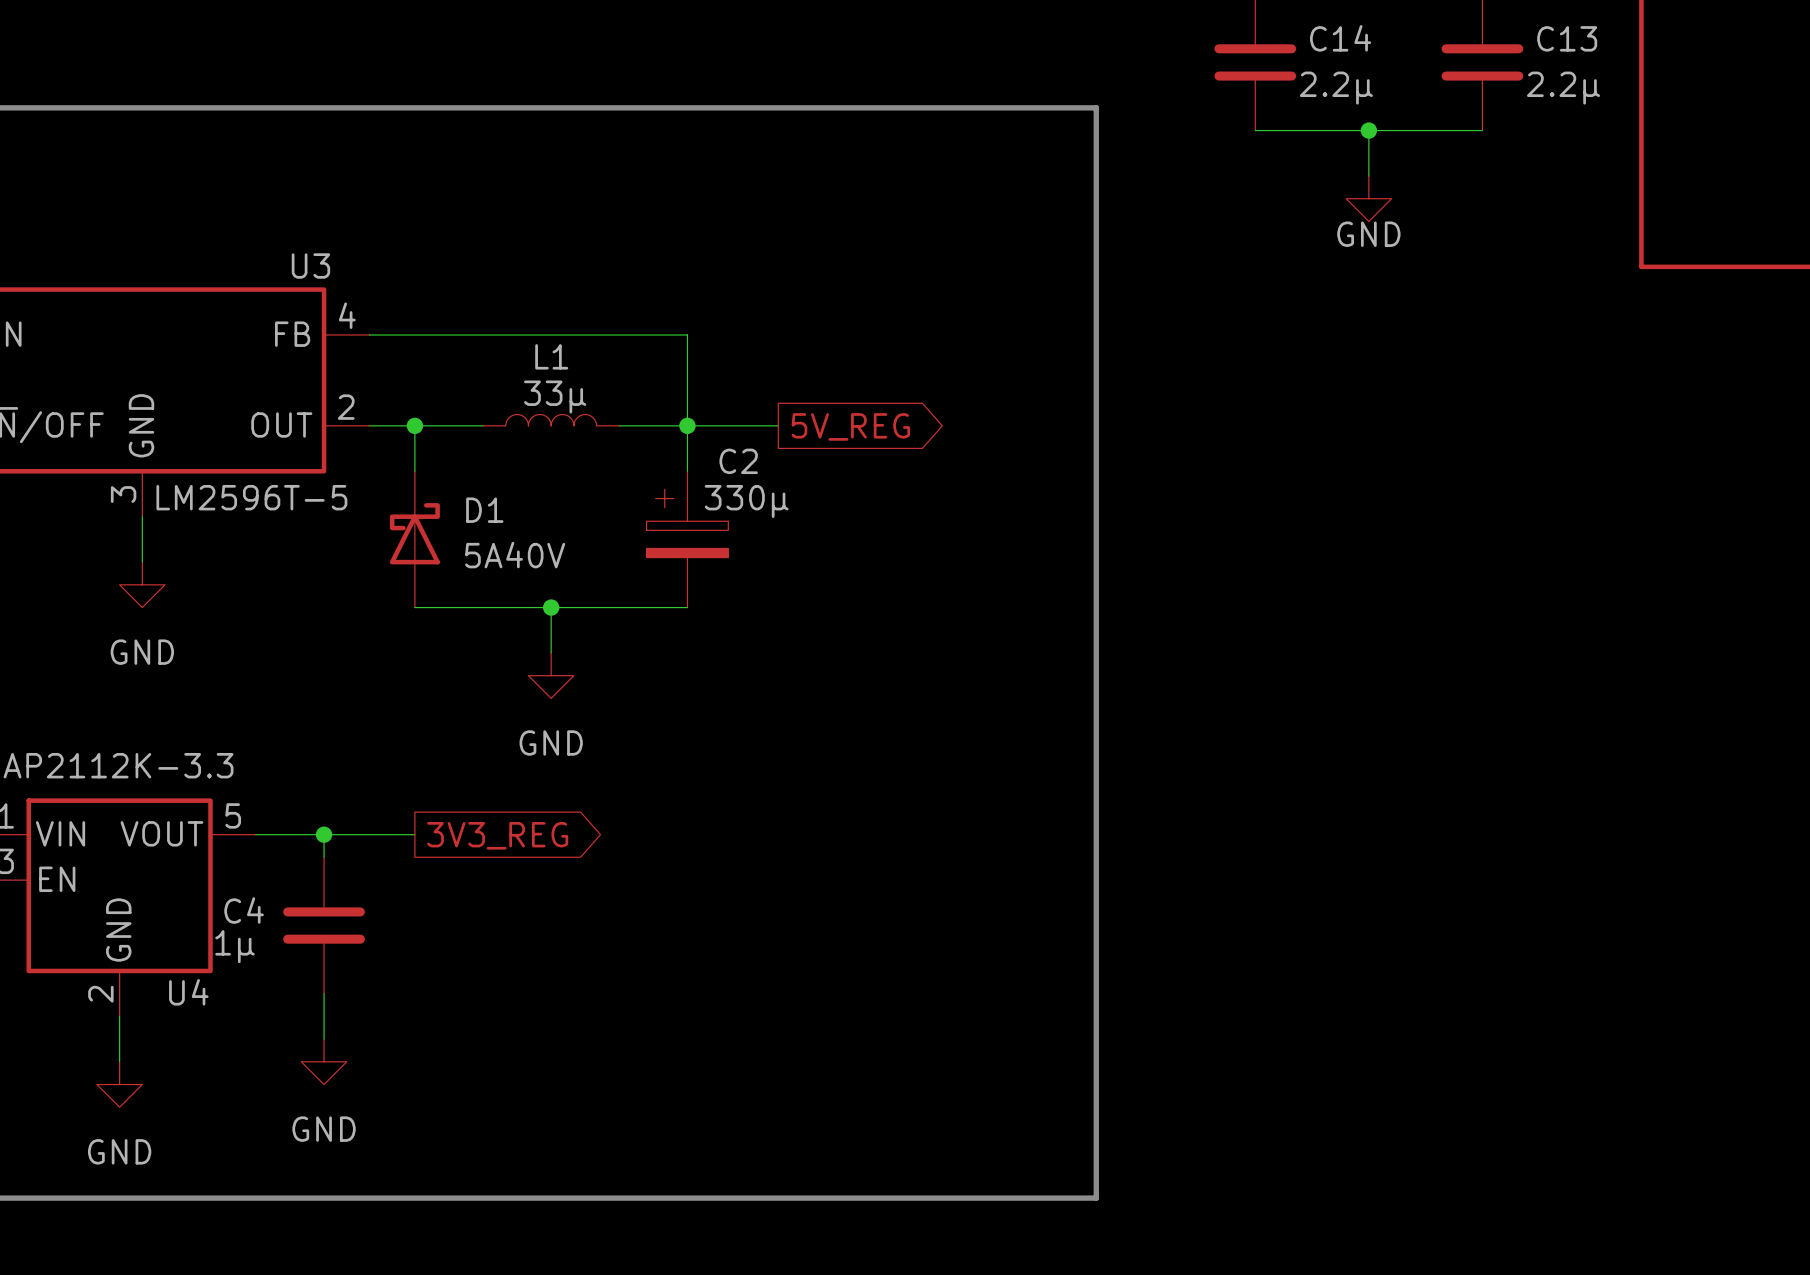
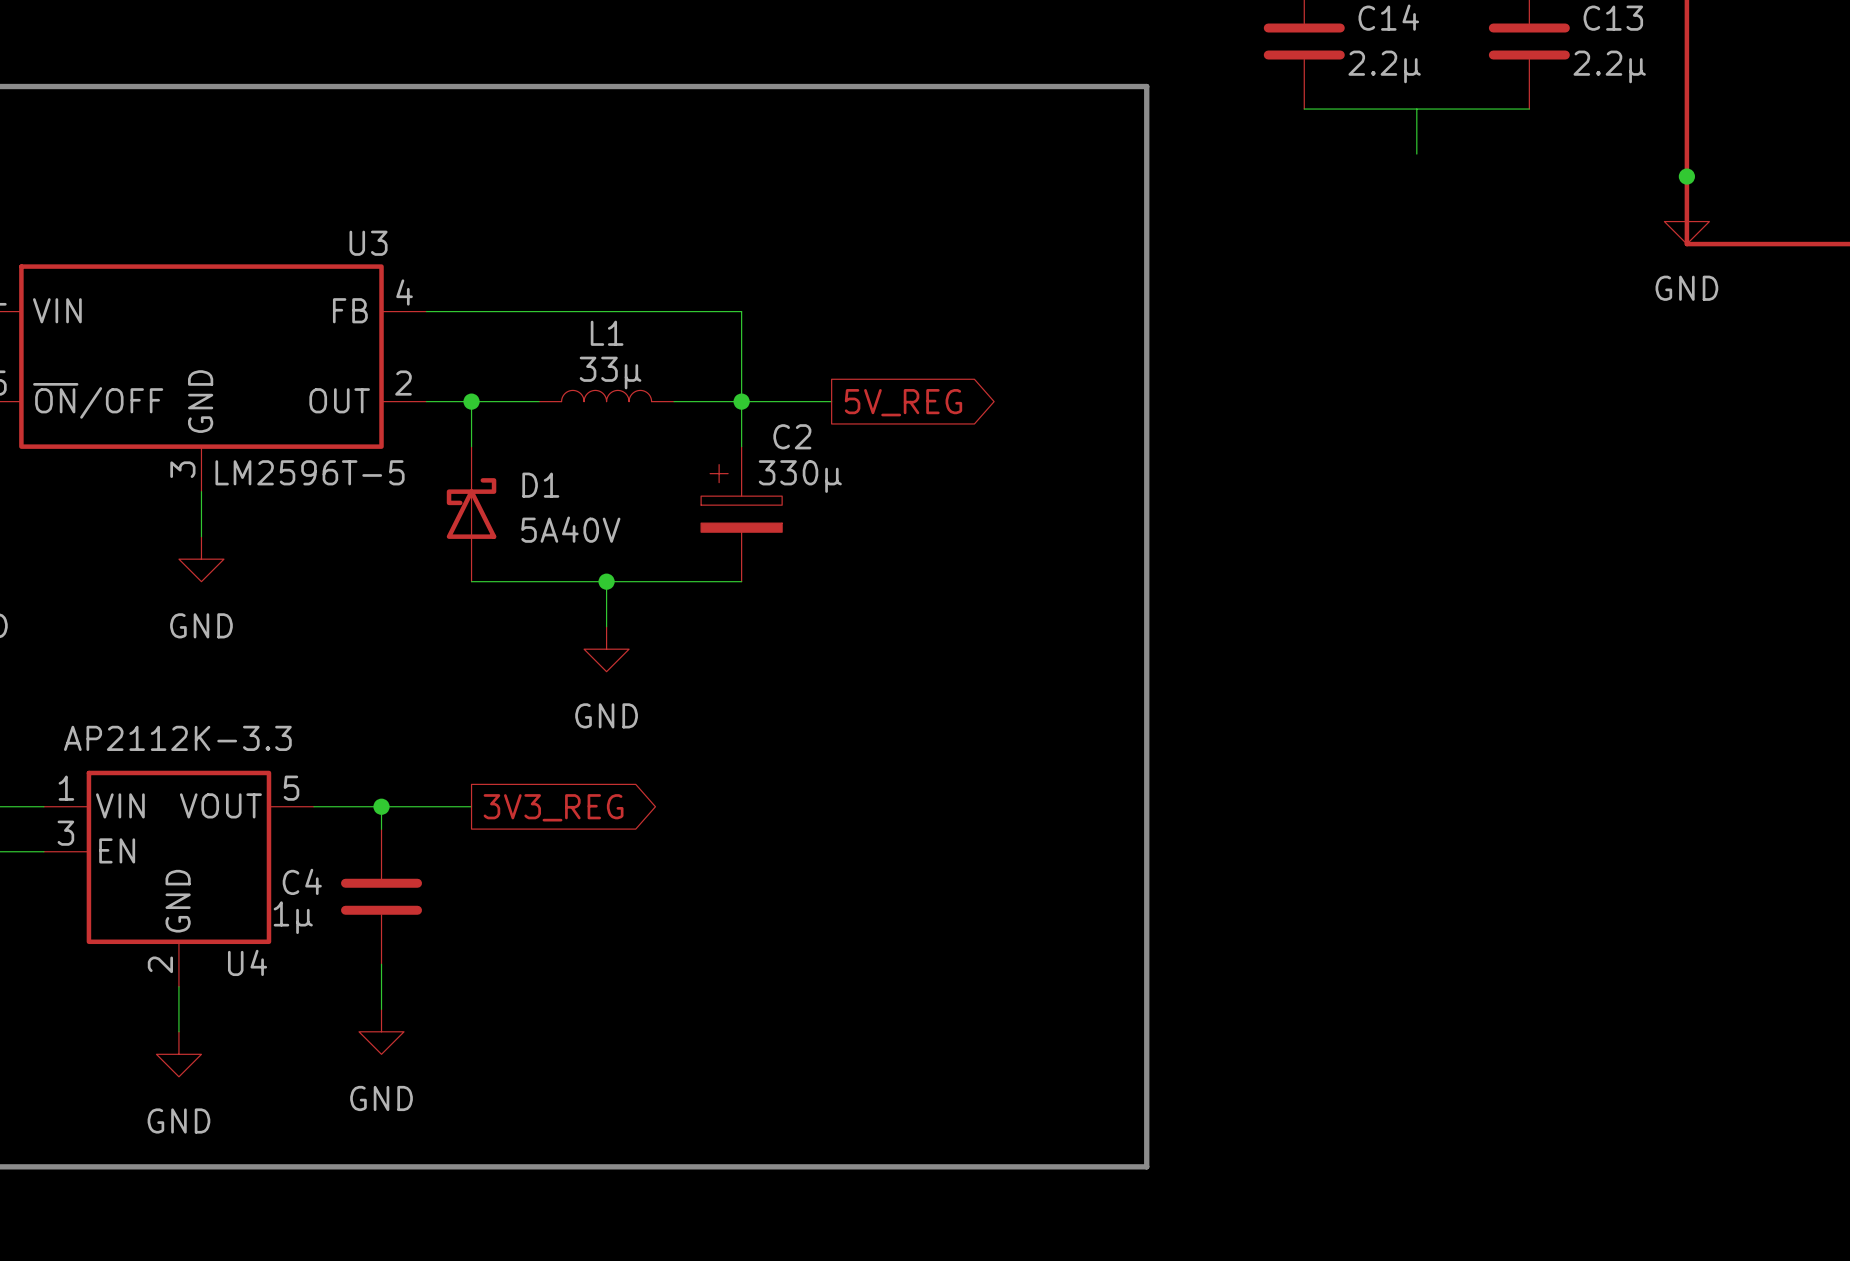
junction: (1368, 130) -> none
power symbol: GND (1368, 198) -> none
junction: none -> (1686, 176)
power symbol: none -> GND (1686, 221)

